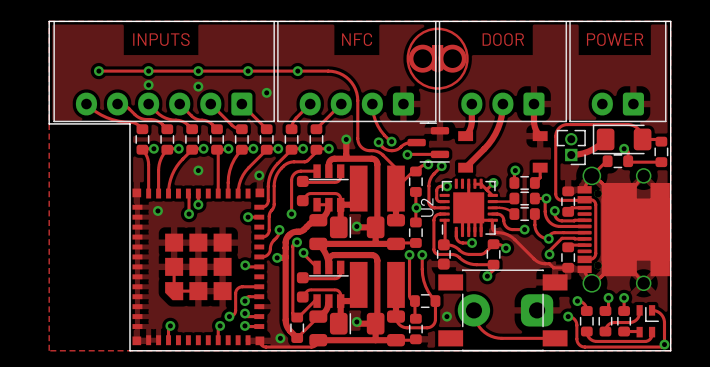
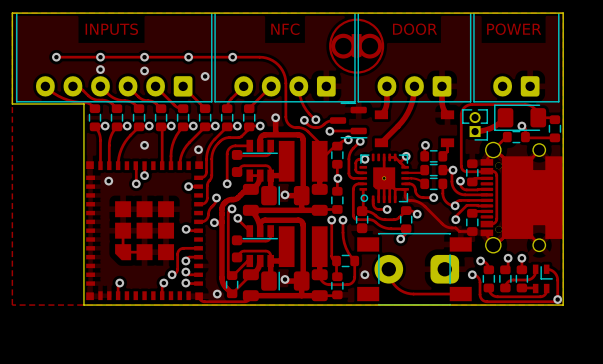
U2: (468, 207) -> none
part: none -> (384, 178)

